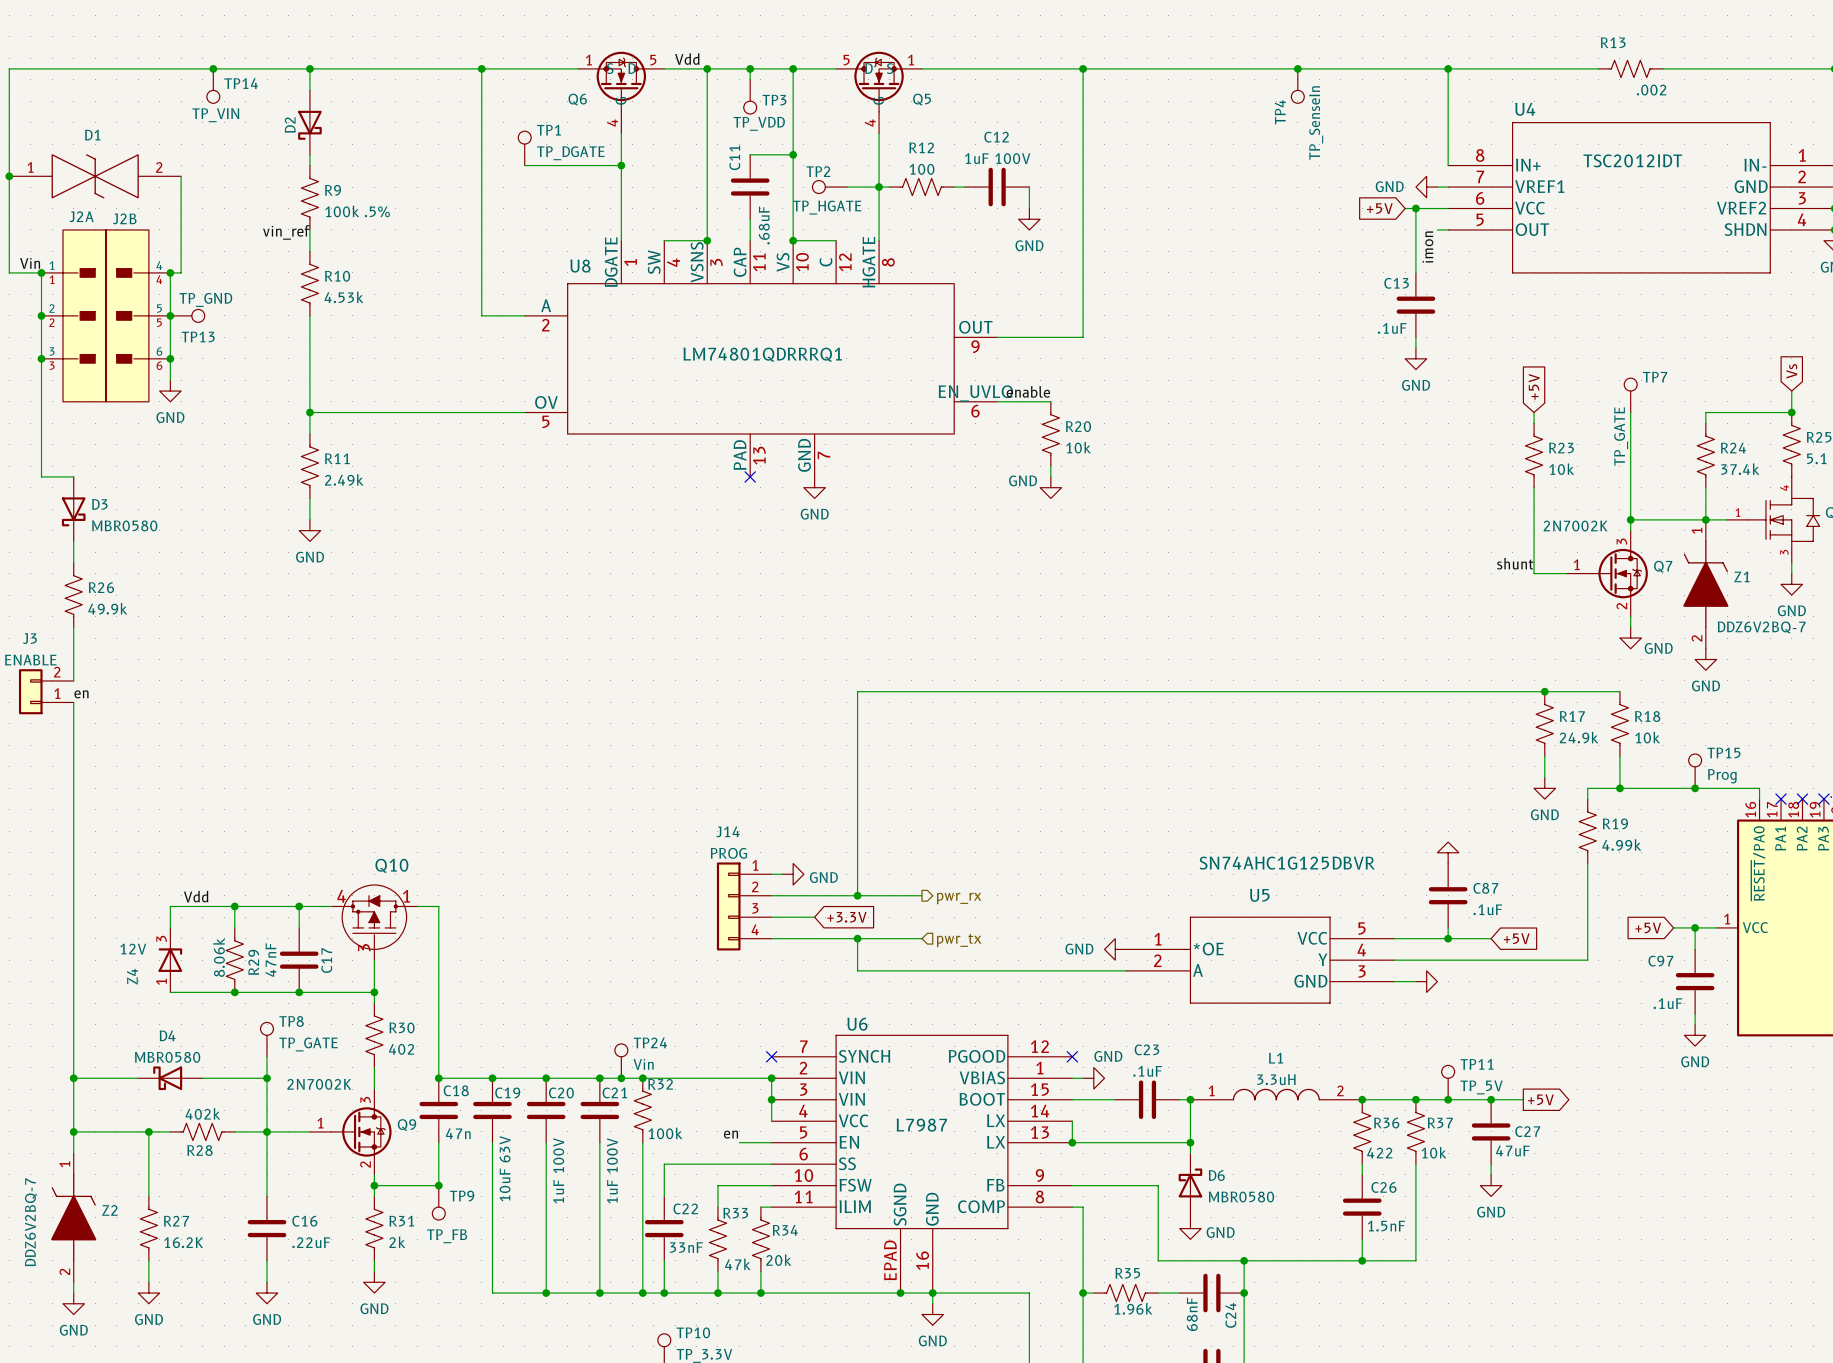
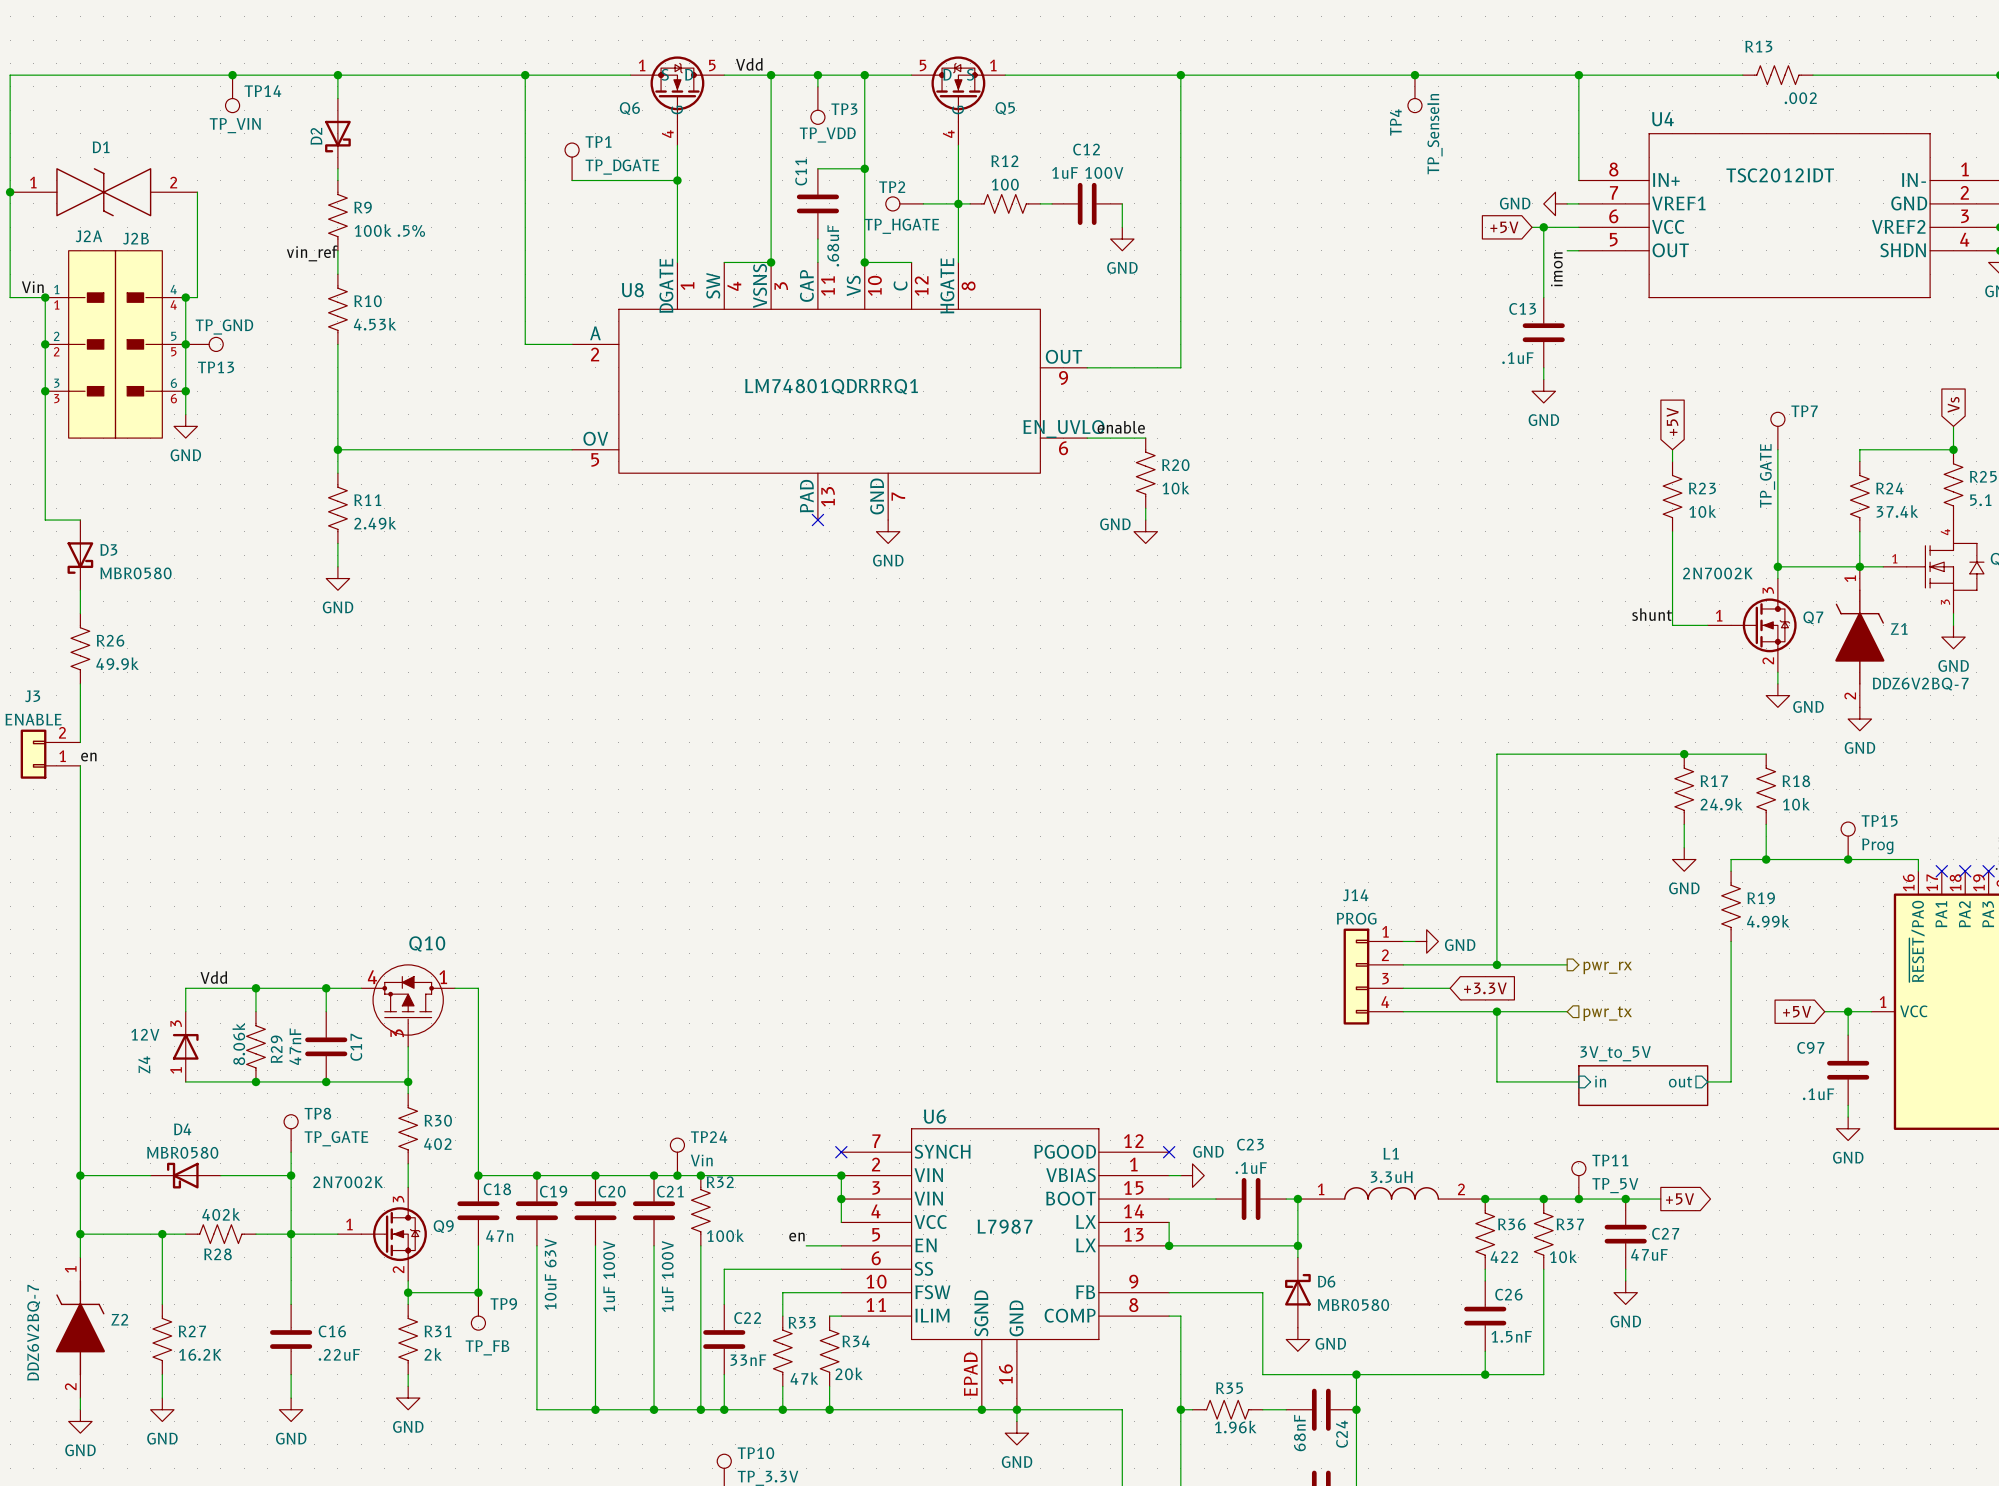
wire: (1372, 691) (857, 691) (857, 895) -> (1496, 754) (1496, 964)
power symbol: (1448, 852) -> none
wire: none -> (1403, 941) (1414, 941)
power symbol: none -> GND (1426, 941)
wire: (771, 874) (782, 874) -> none
power symbol: GND (793, 874) -> none
wire: none -> (1403, 964) (1567, 964)
junction: none -> (1496, 964)
hierarchical label: none -> pwr_rx (1607, 967)
wire: (771, 895) (922, 895) -> none
junction: (857, 895) -> none
C87: .1uF (1448, 895) -> none
hierarchical label: pwr_rx (959, 898) -> none
J14 position: (744, 906) -> (1373, 976)
wire: none -> (1403, 988) (1450, 988)
global label: none -> +3.3V (1485, 988)
wire: (771, 917) (814, 917) -> none
global label: +3.3V (846, 917) -> none
wire: none -> (1403, 1011) (1567, 1011)
wire: none -> (1496, 1011) (1496, 1081) (1578, 1081)
junction: none -> (1496, 1011)
wire: (1448, 927) (1448, 938) -> none
hierarchical label: none -> pwr_tx (1607, 1013)
wire: (771, 938) (922, 938) -> none
wire: (857, 938) (857, 970) (1126, 970) -> none
junction: (857, 938) -> none
wire: (1394, 938) (1491, 938) -> none
junction: (1448, 938) -> none
global label: +5V (1516, 938) -> none
hierarchical label: pwr_tx (959, 940) -> none
power symbol: GND (1115, 949) -> none
U5: SN74AHC1G125DBVR (1260, 960) -> none
wire: (1394, 960) (1587, 960) -> (1707, 1081) (1731, 1081) (1731, 1046)
wire: (1394, 981) (1415, 981) -> none
power symbol: (1426, 981) -> none
sheet pin: none -> in (1600, 1081)
sheet pin: none -> out (1680, 1081)
sheet 3V_to_5V: none -> (1643, 1085)

